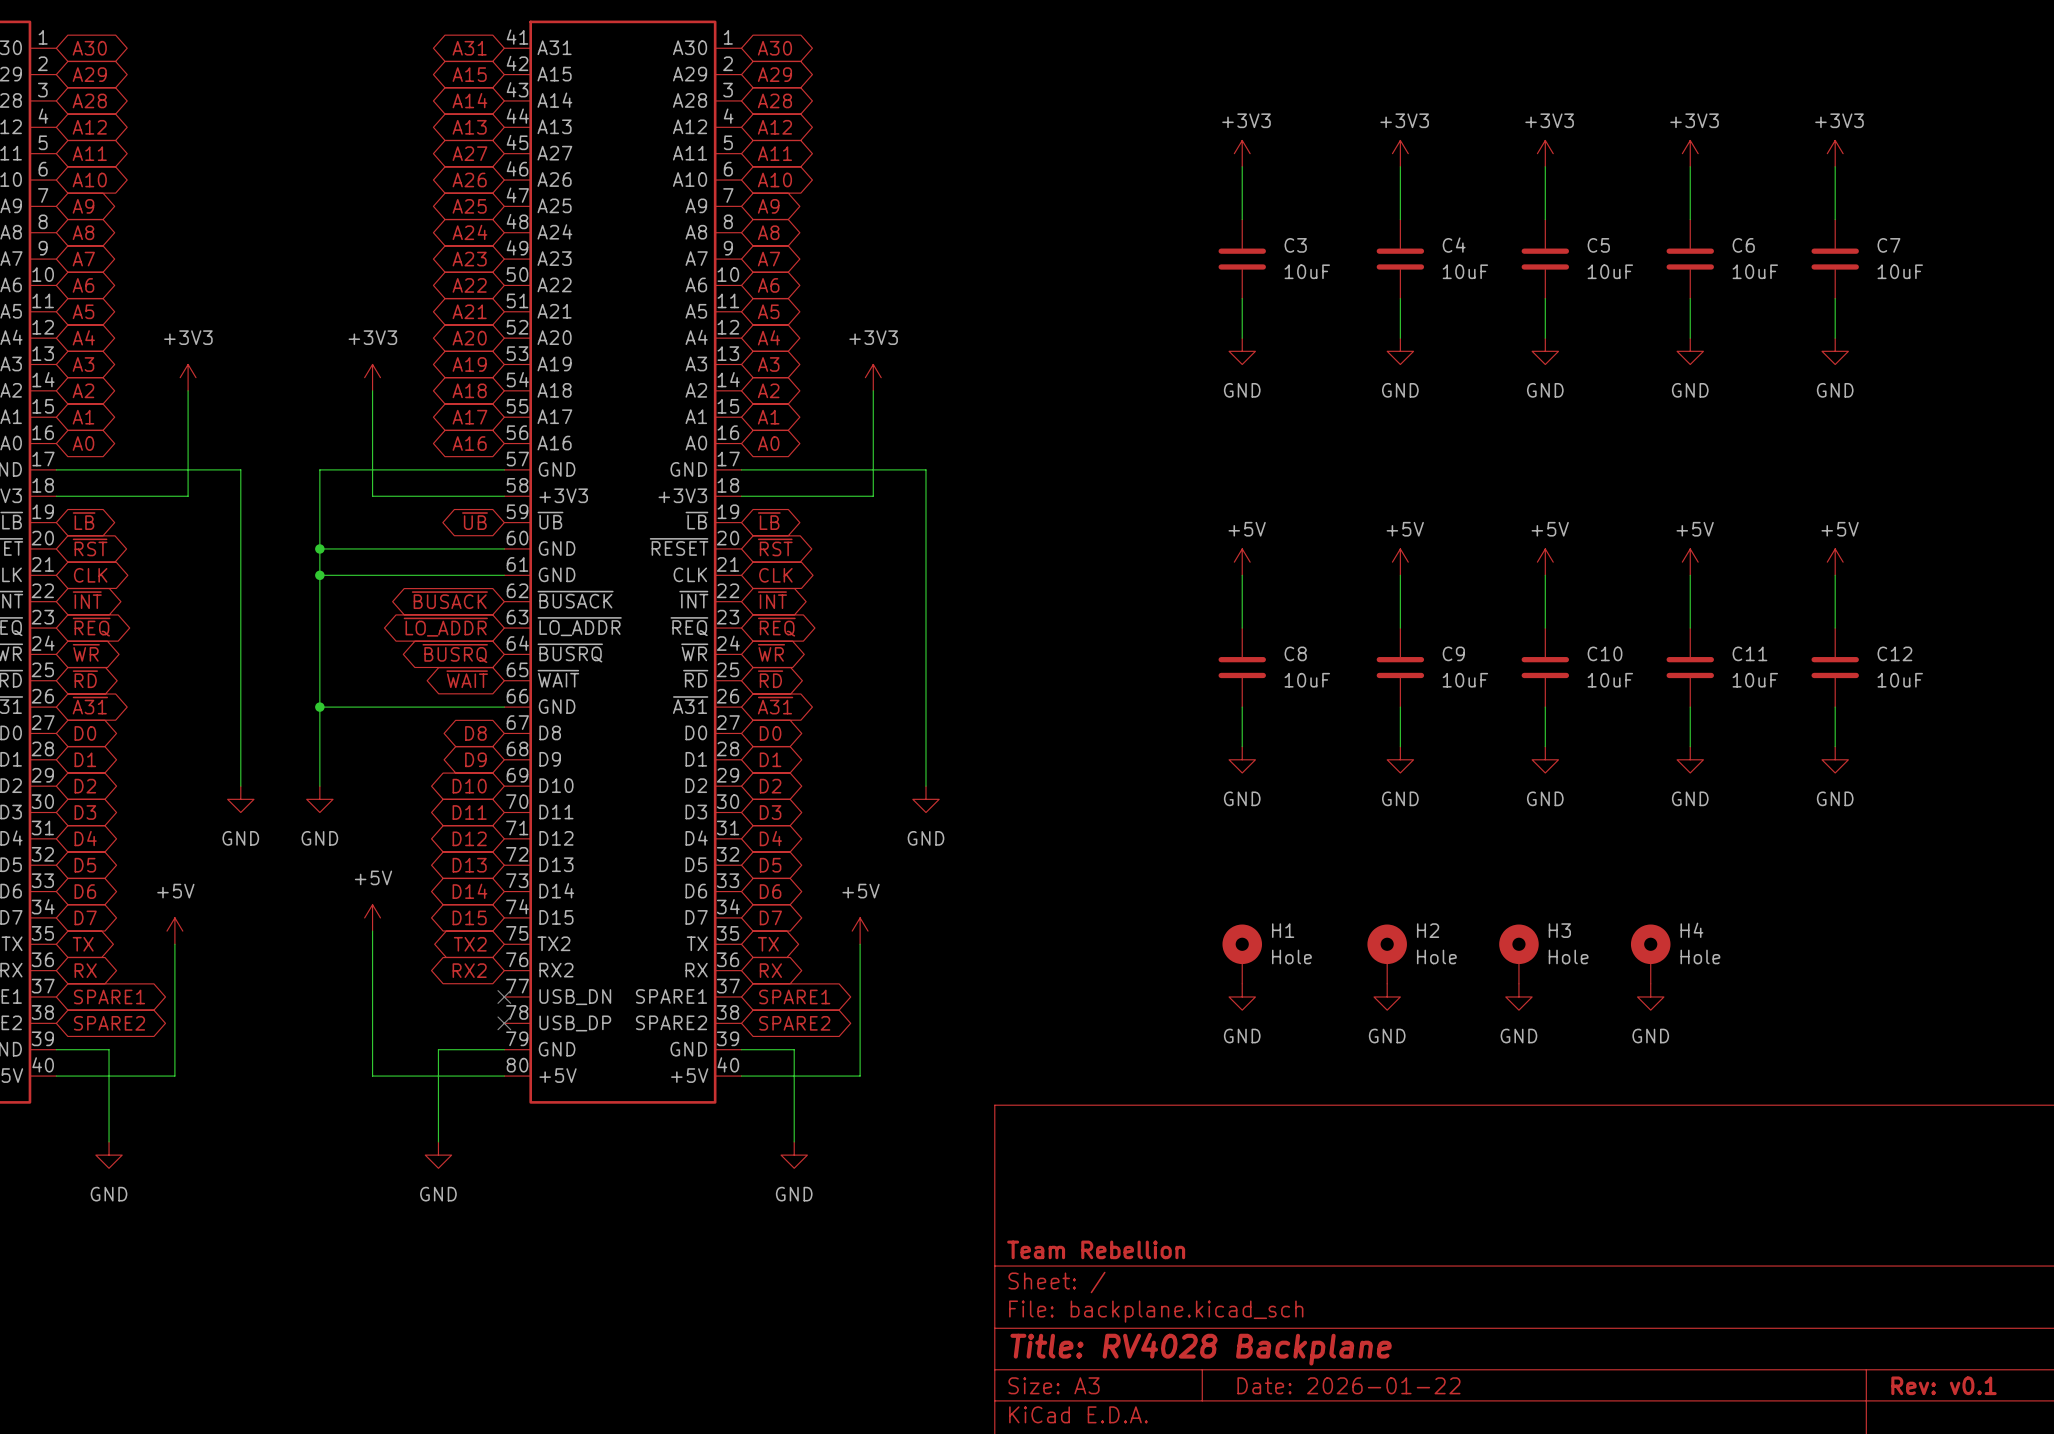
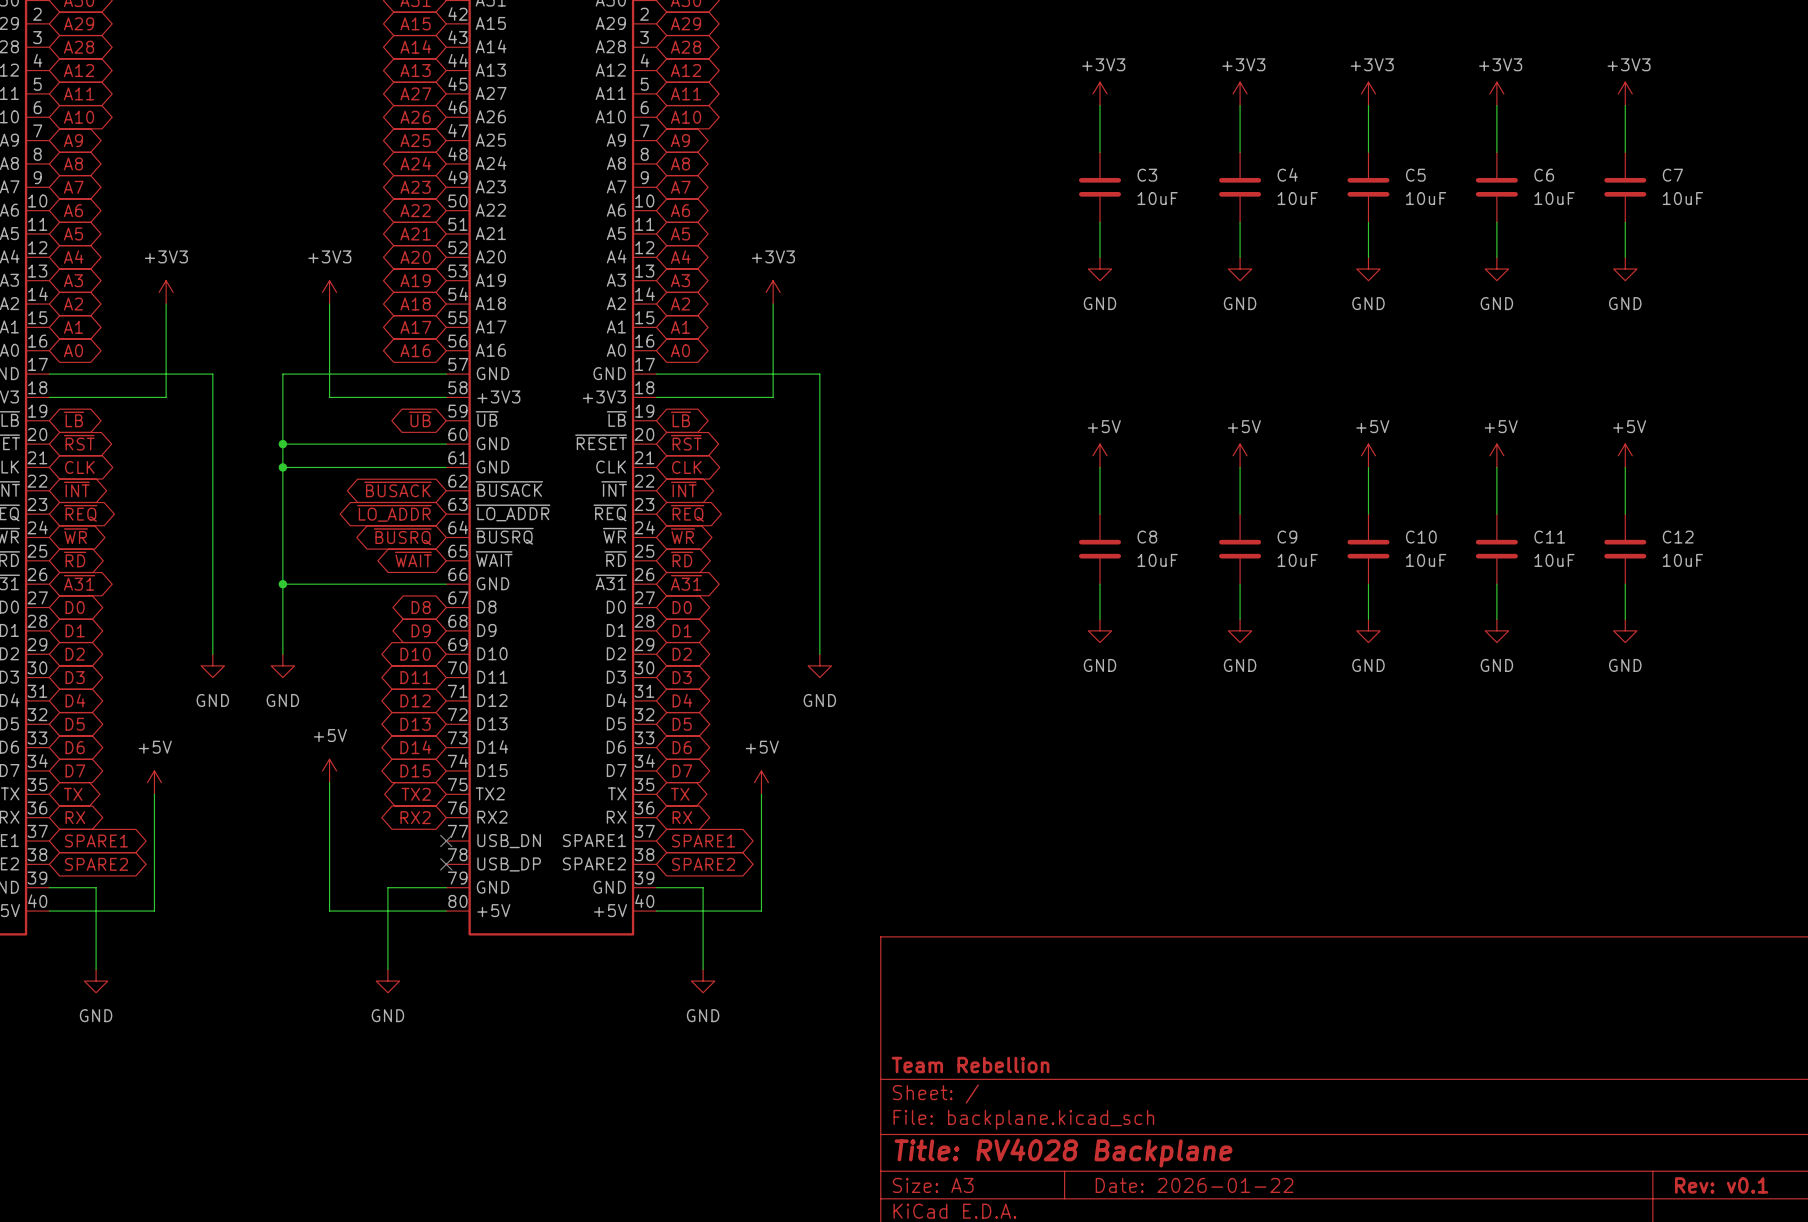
H1: Hole (1242, 954) -> none
H2: Hole (1387, 954) -> none
H3: Hole (1518, 954) -> none
H4: Hole (1650, 954) -> none
power symbol: GND (1242, 996) -> none
power symbol: GND (1387, 996) -> none
power symbol: GND (1518, 996) -> none
power symbol: GND (1650, 996) -> none

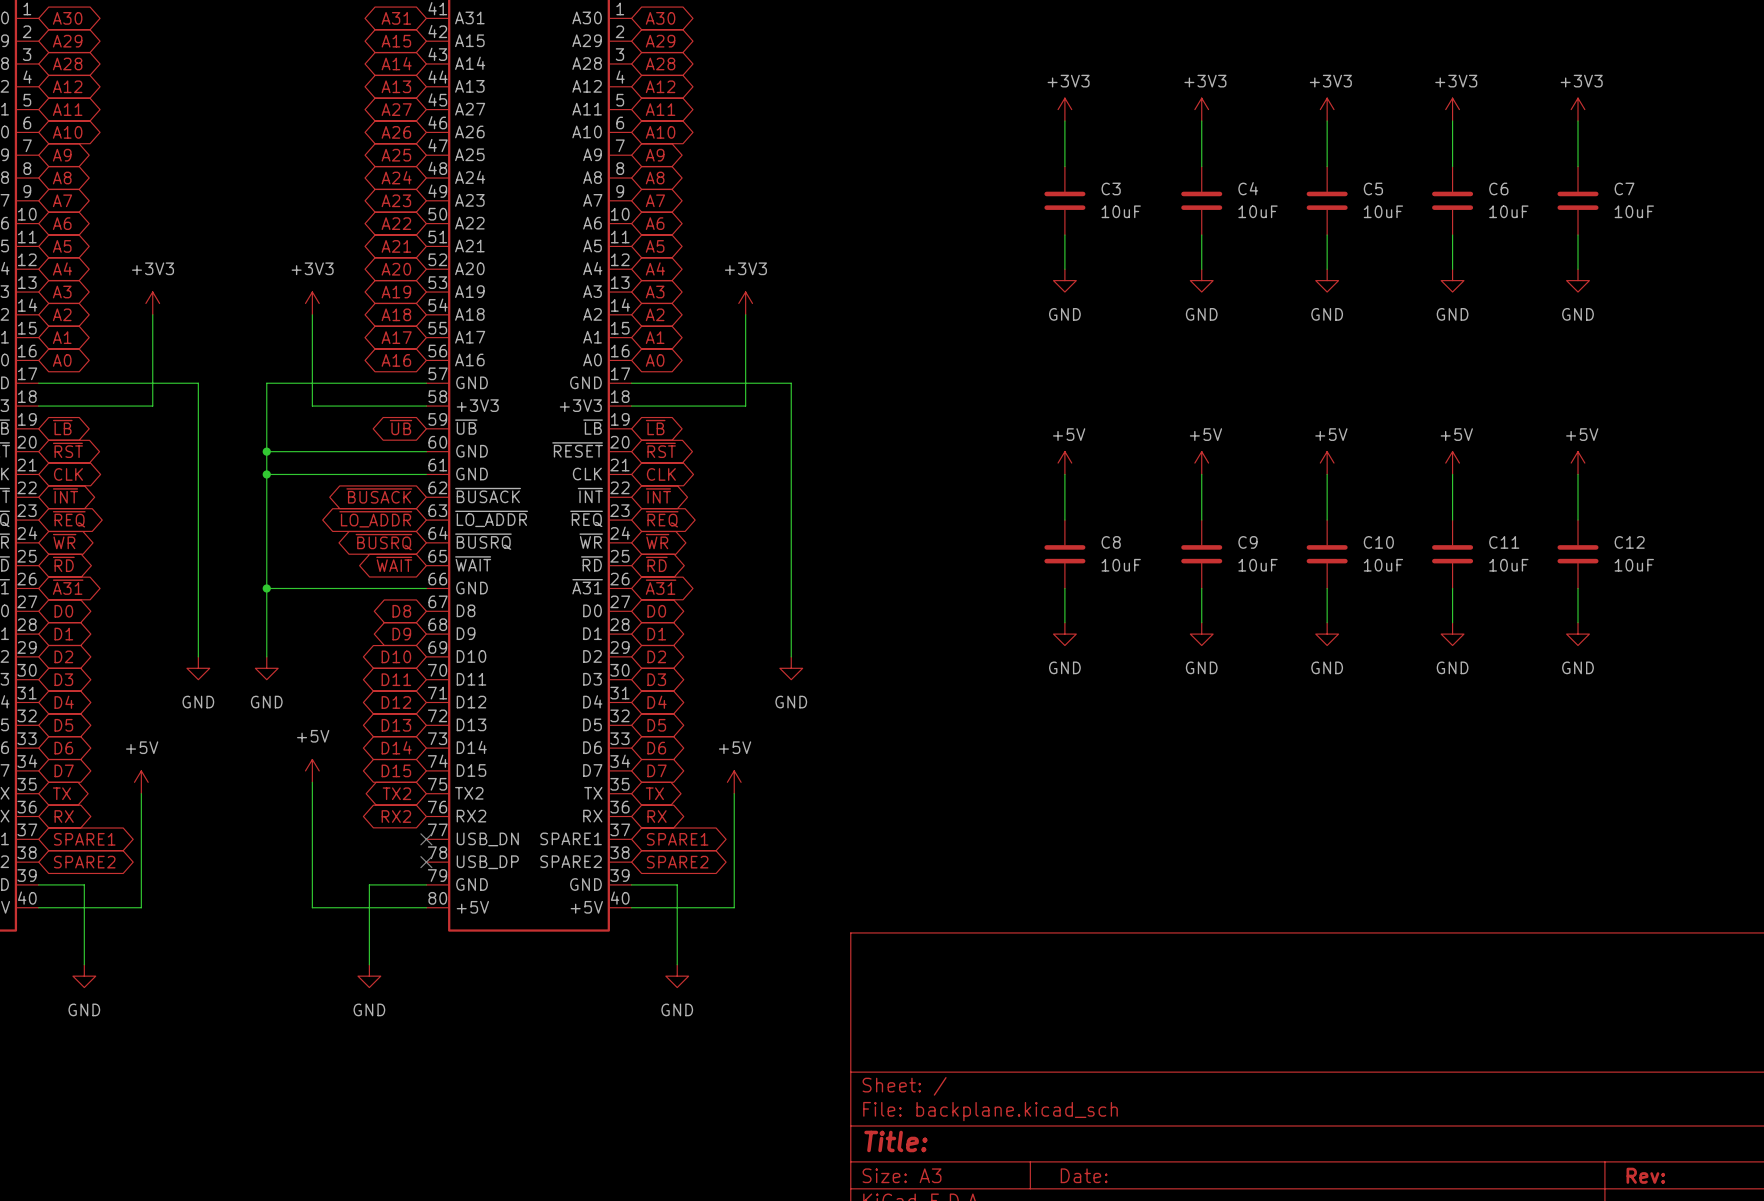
title block: Team Rebellion (970, 1065) -> none
title block: Title: RV4028 Backplane (1063, 1152) -> Title: (895, 1141)
title block: Date: 2026-01-22 (1194, 1185) -> Date: (1084, 1175)
title block: Rev: v0.1 (1721, 1185) -> Rev: (1645, 1175)

